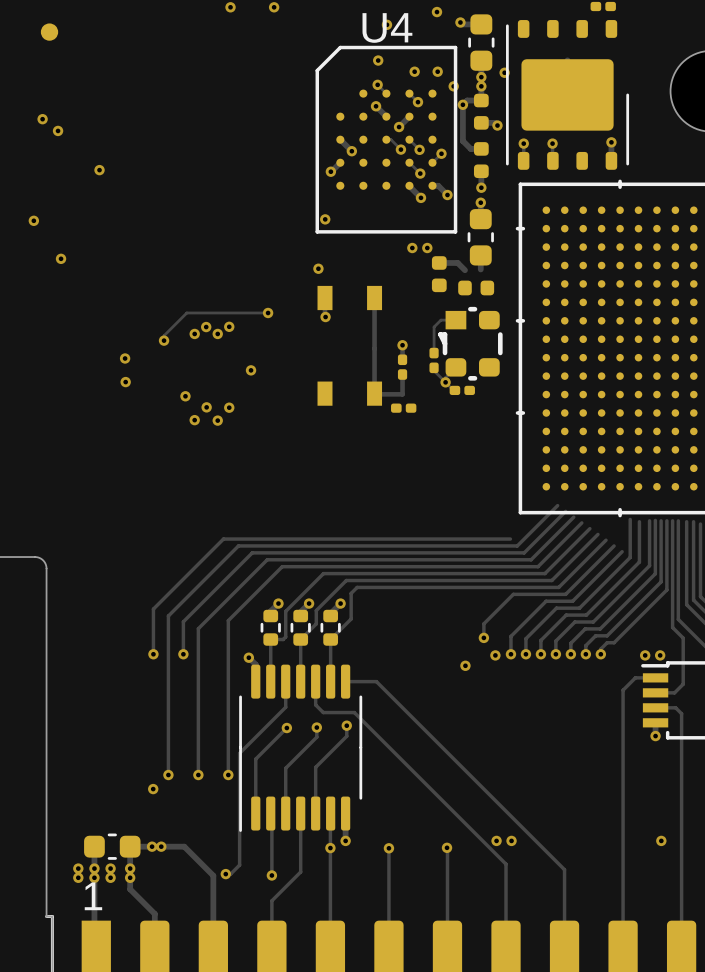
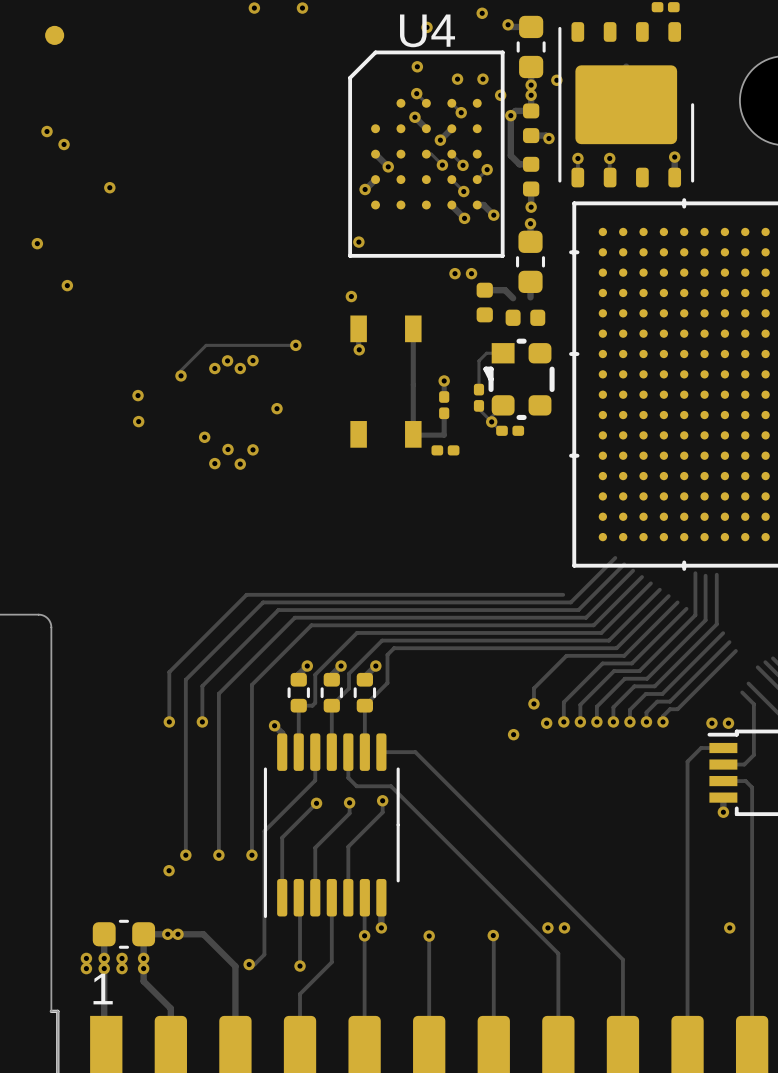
track: (655, 520) (655, 573) -> none
track: (661, 520) (661, 581) -> none
track: (666, 520) (666, 589) -> none
track: (672, 520) (672, 627) -> none
track: (678, 520) (678, 619) -> none
track: (686, 521) (686, 604) -> none
track: (693, 521) (693, 600) -> none
track: (700, 524) (700, 596) -> none

